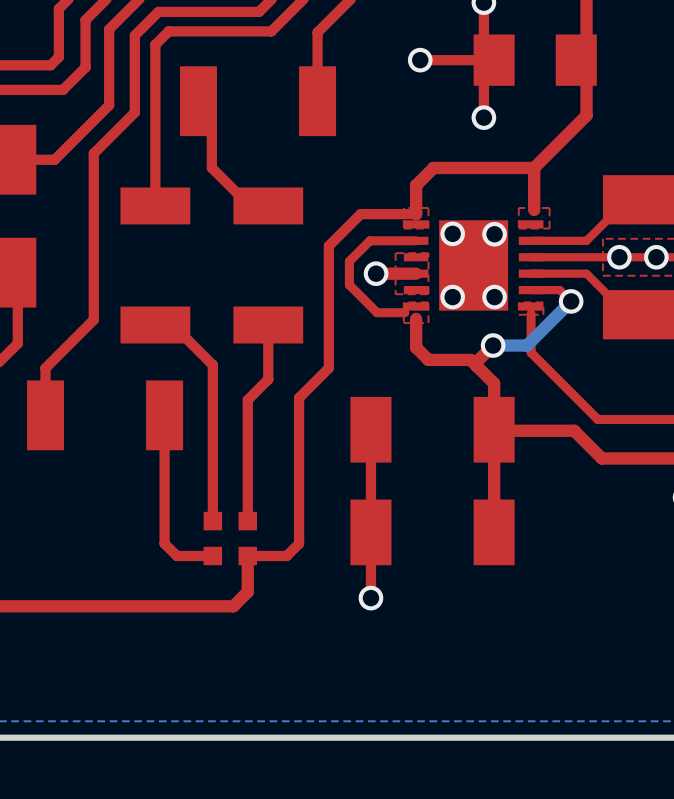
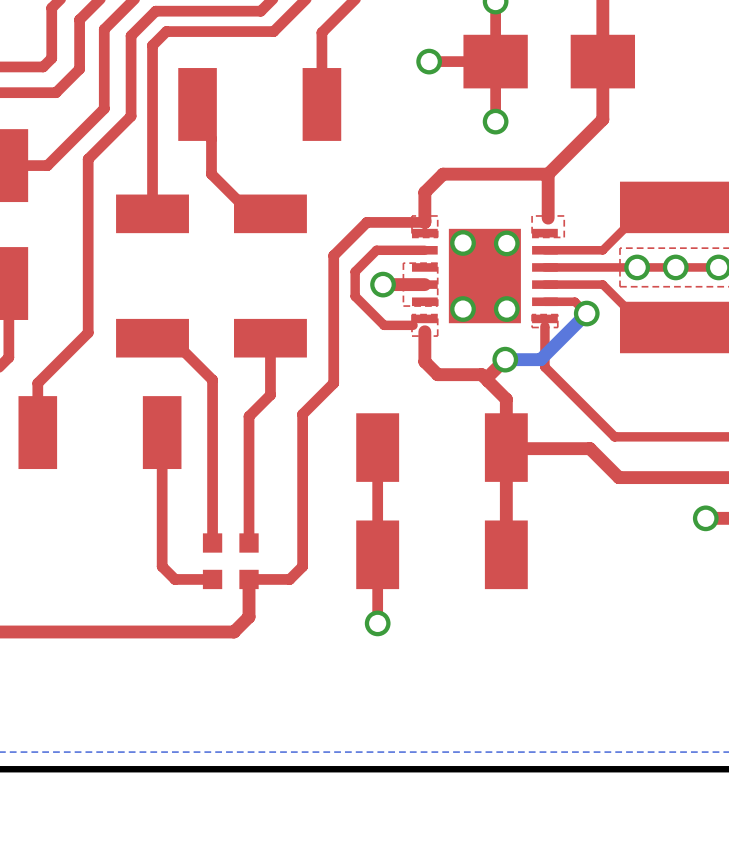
part footprint: [473, 34, 597, 86] -> [463, 34, 636, 89]

